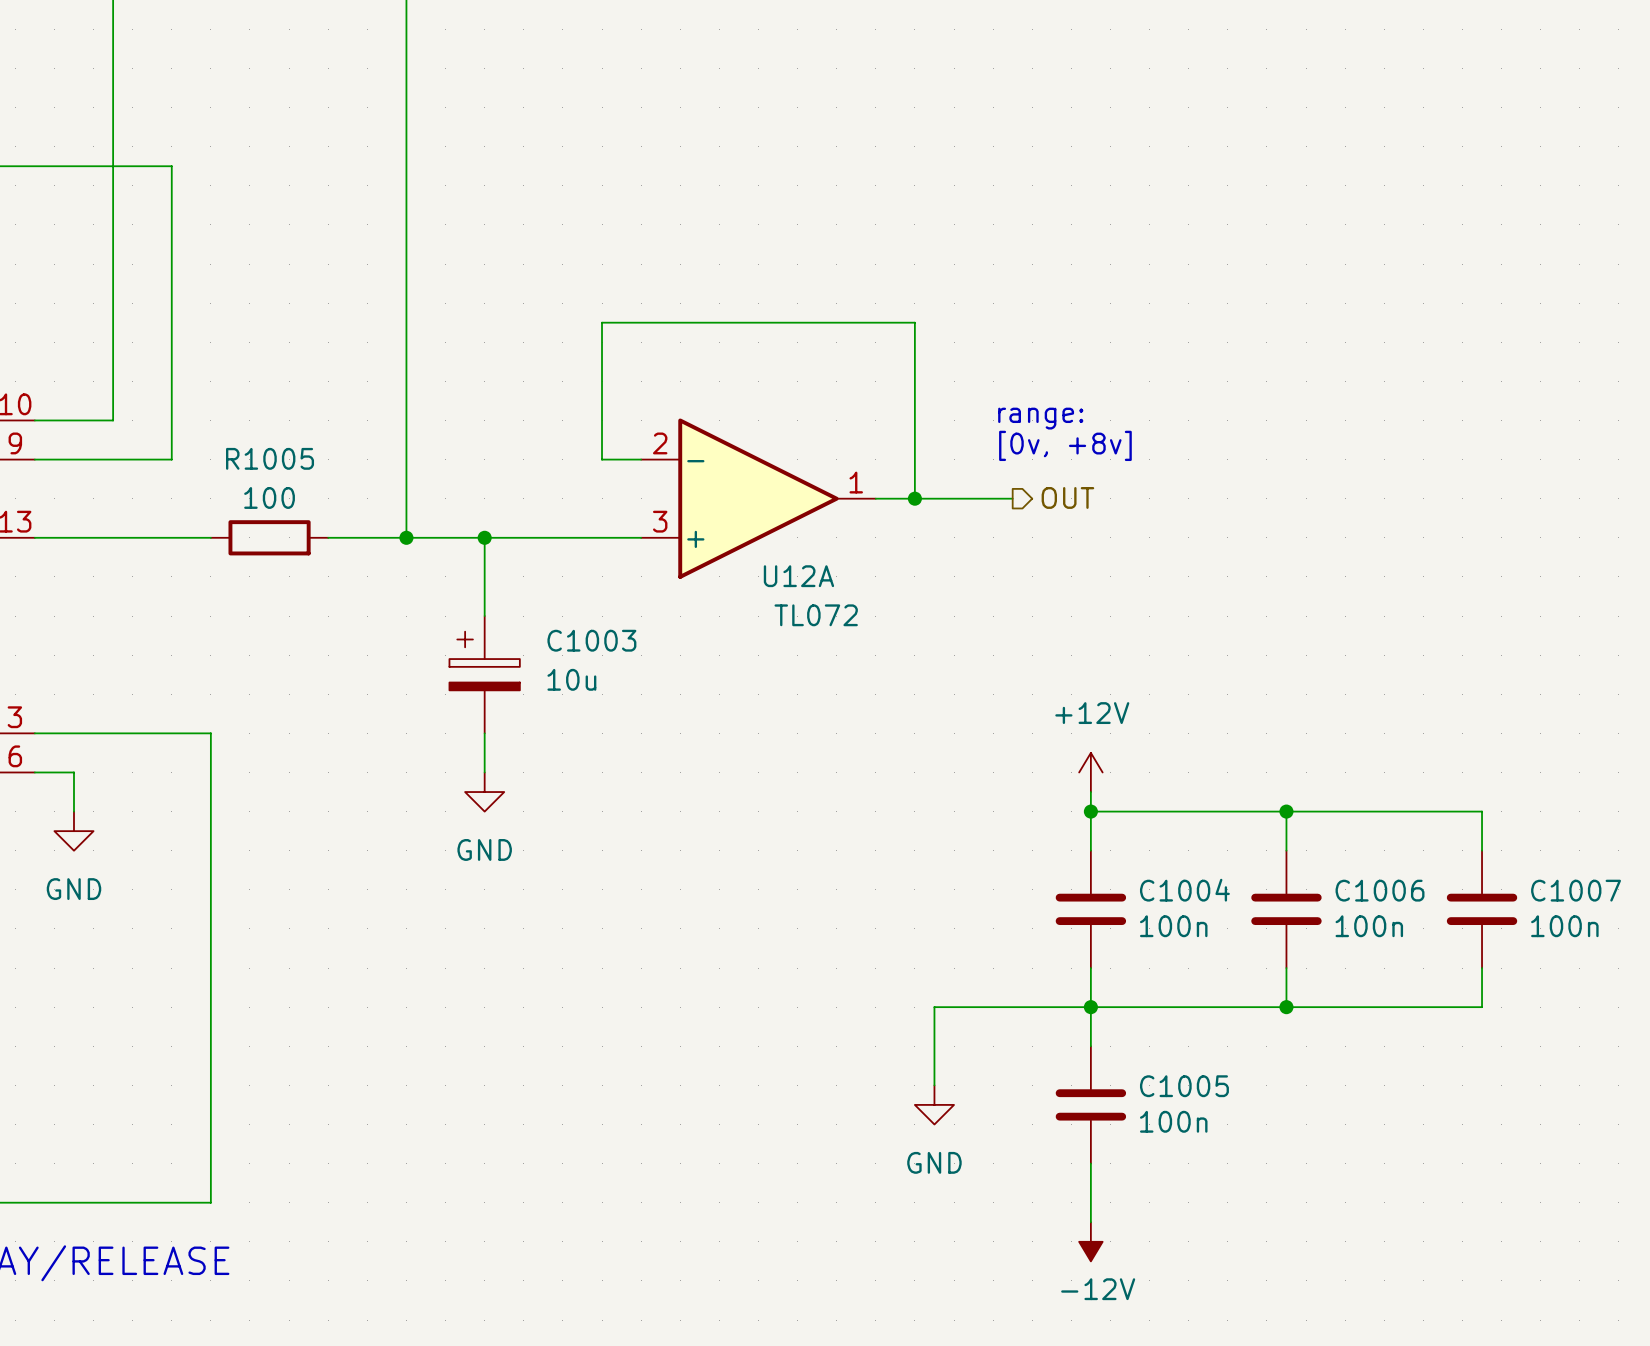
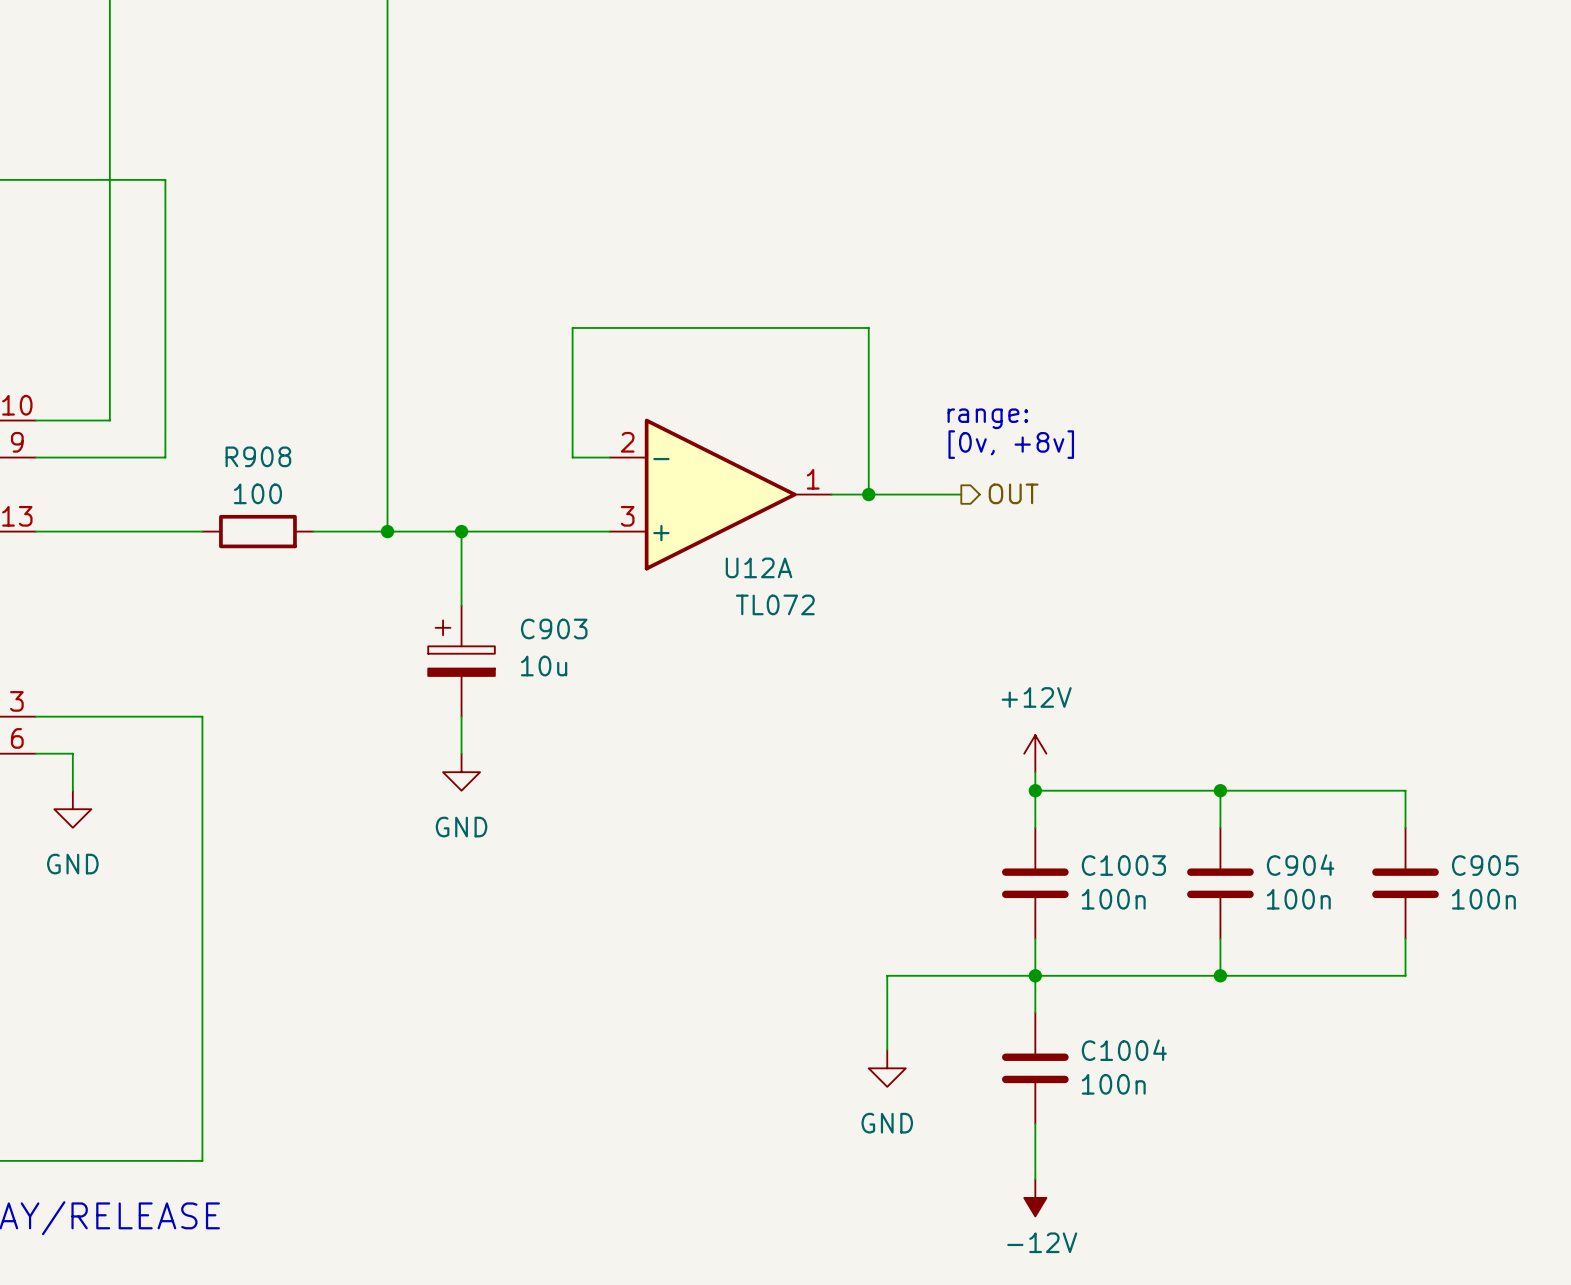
R1005 name: R1005 (270, 458) -> R908 (258, 456)
C1003 name: C1003 (591, 640) -> C903 (554, 628)
C1004 name: C1004 (1184, 890) -> C1003 (1123, 865)
C1006 name: C1006 (1380, 890) -> C904 (1300, 865)
C1007 name: C1007 (1576, 890) -> C905 (1485, 865)
C1005 name: C1005 (1184, 1086) -> C1004 (1124, 1050)

